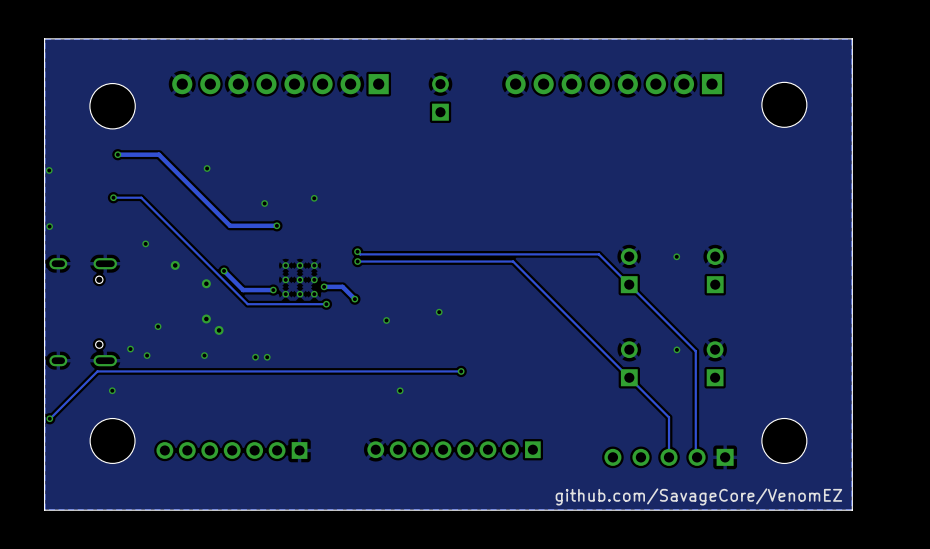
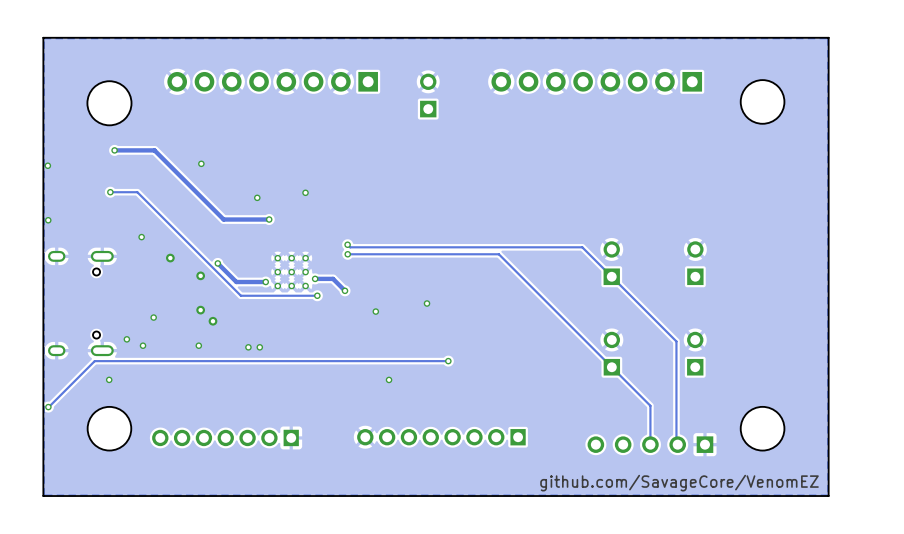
via: (676, 256) -> none
via: (676, 349) -> none

